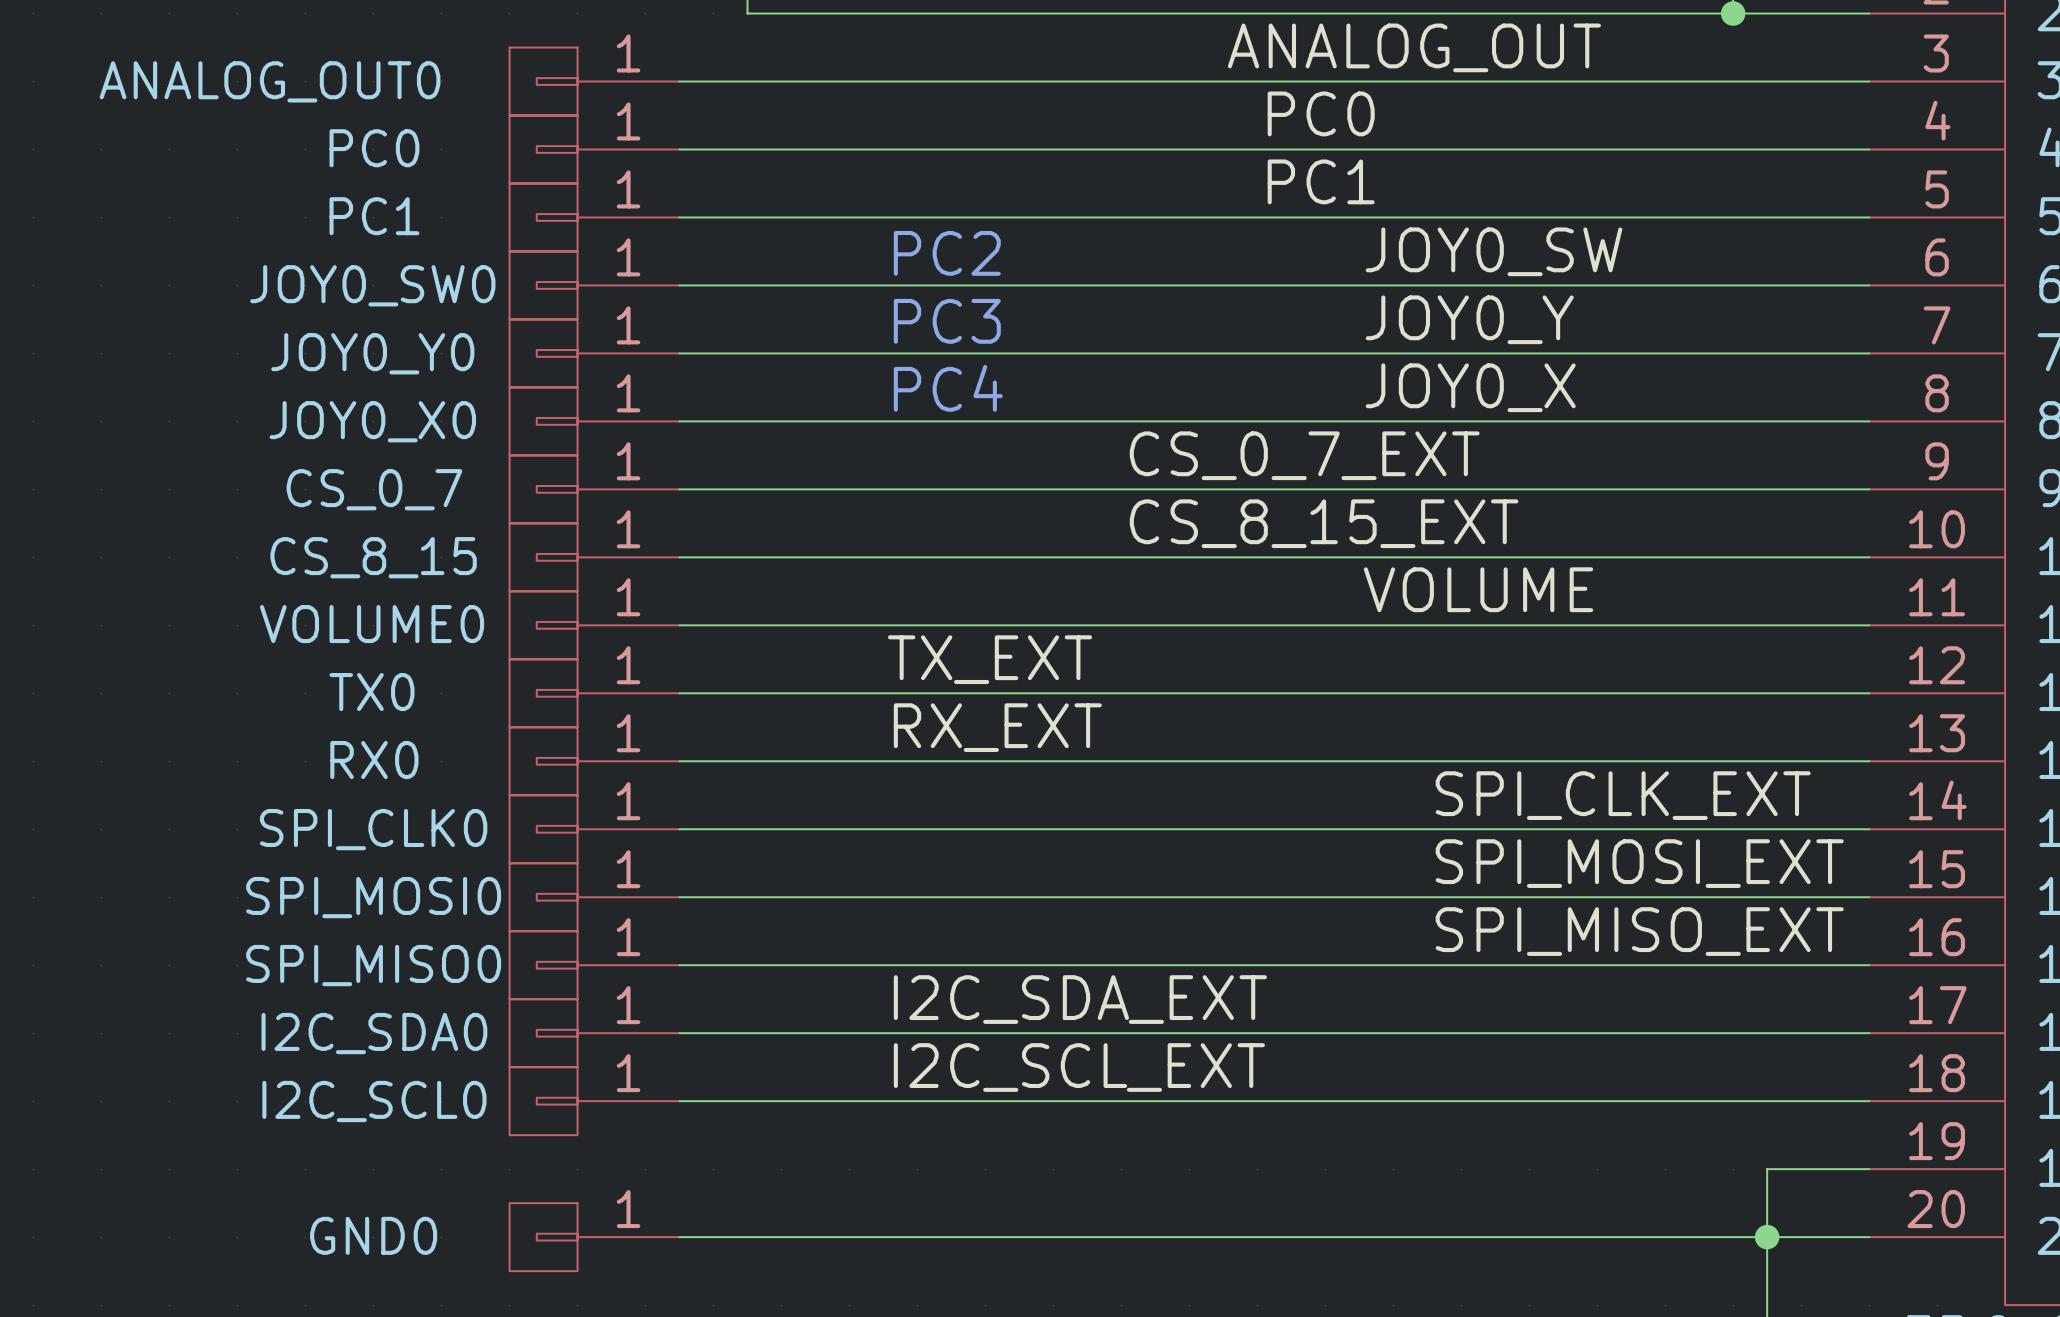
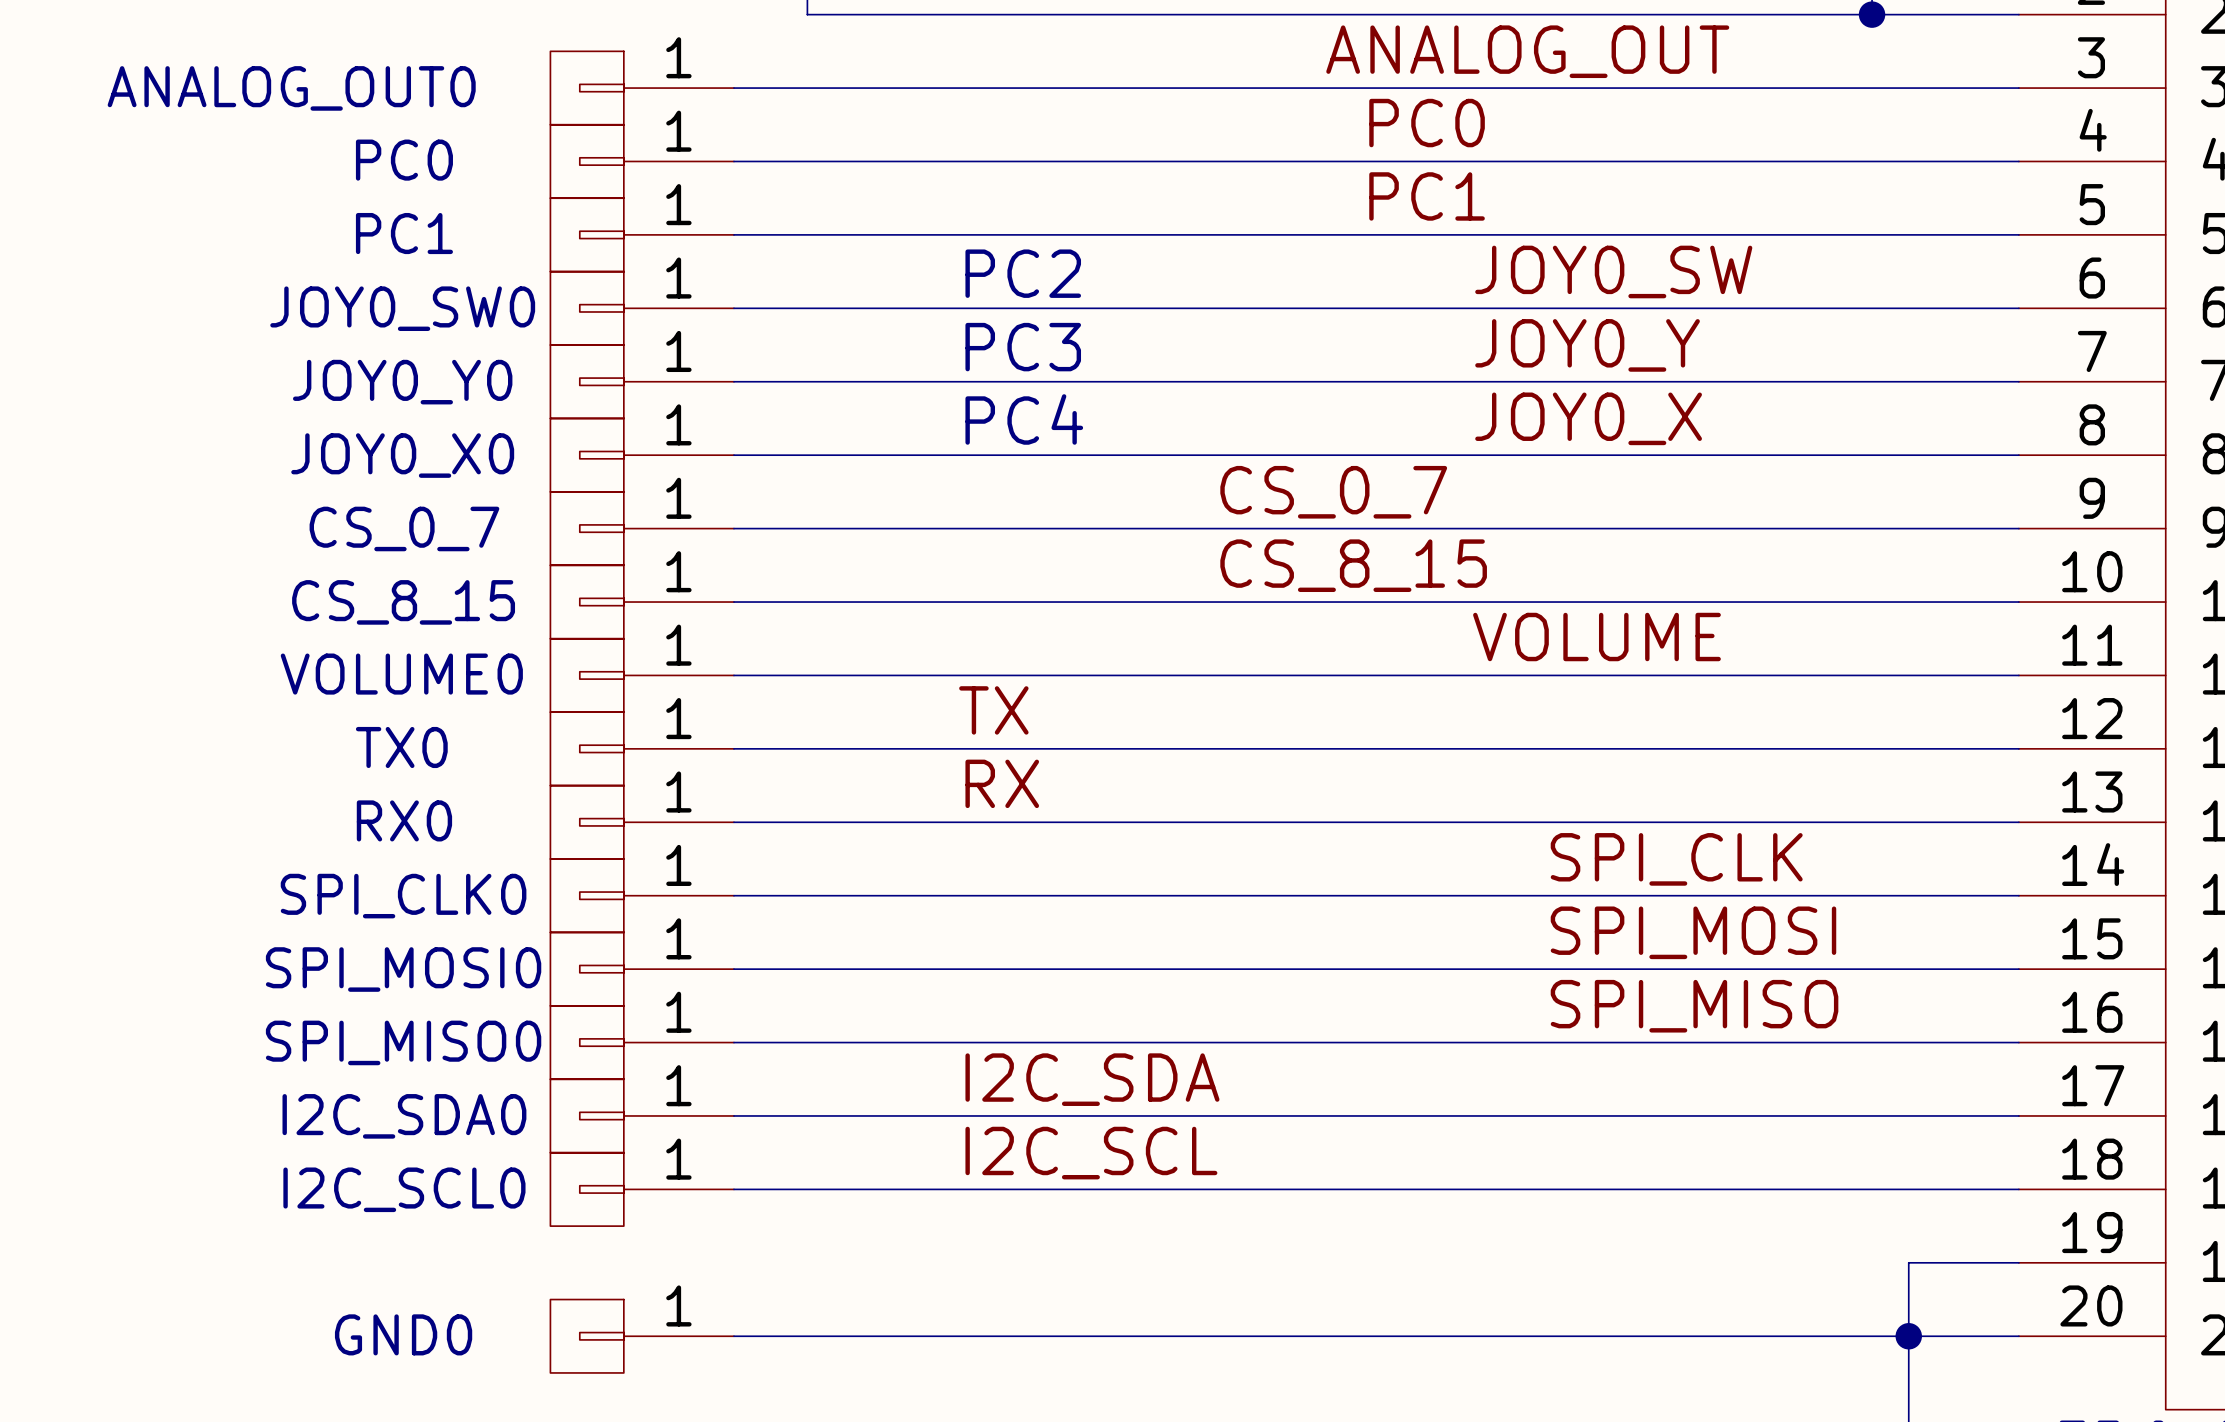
label: CS_0_7_EXT (1304, 455) -> CS_0_7 (1333, 492)
label: CS_8_15_EXT (1324, 523) -> CS_8_15 (1353, 565)
label: TX_EXT (990, 659) -> TX (993, 710)
label: RX_EXT (997, 727) -> RX (1002, 783)
label: SPI_CLK_EXT (1623, 795) -> SPI_CLK (1676, 859)
label: SPI_MOSI_EXT (1639, 863) -> SPI_MOSI (1693, 932)
label: SPI_MISO_EXT (1639, 931) -> SPI_MISO (1694, 1006)
label: I2C_SDA_EXT (1080, 999) -> I2C_SDA (1092, 1079)
label: I2C_SCL_EXT (1079, 1067) -> I2C_SCL (1091, 1153)

